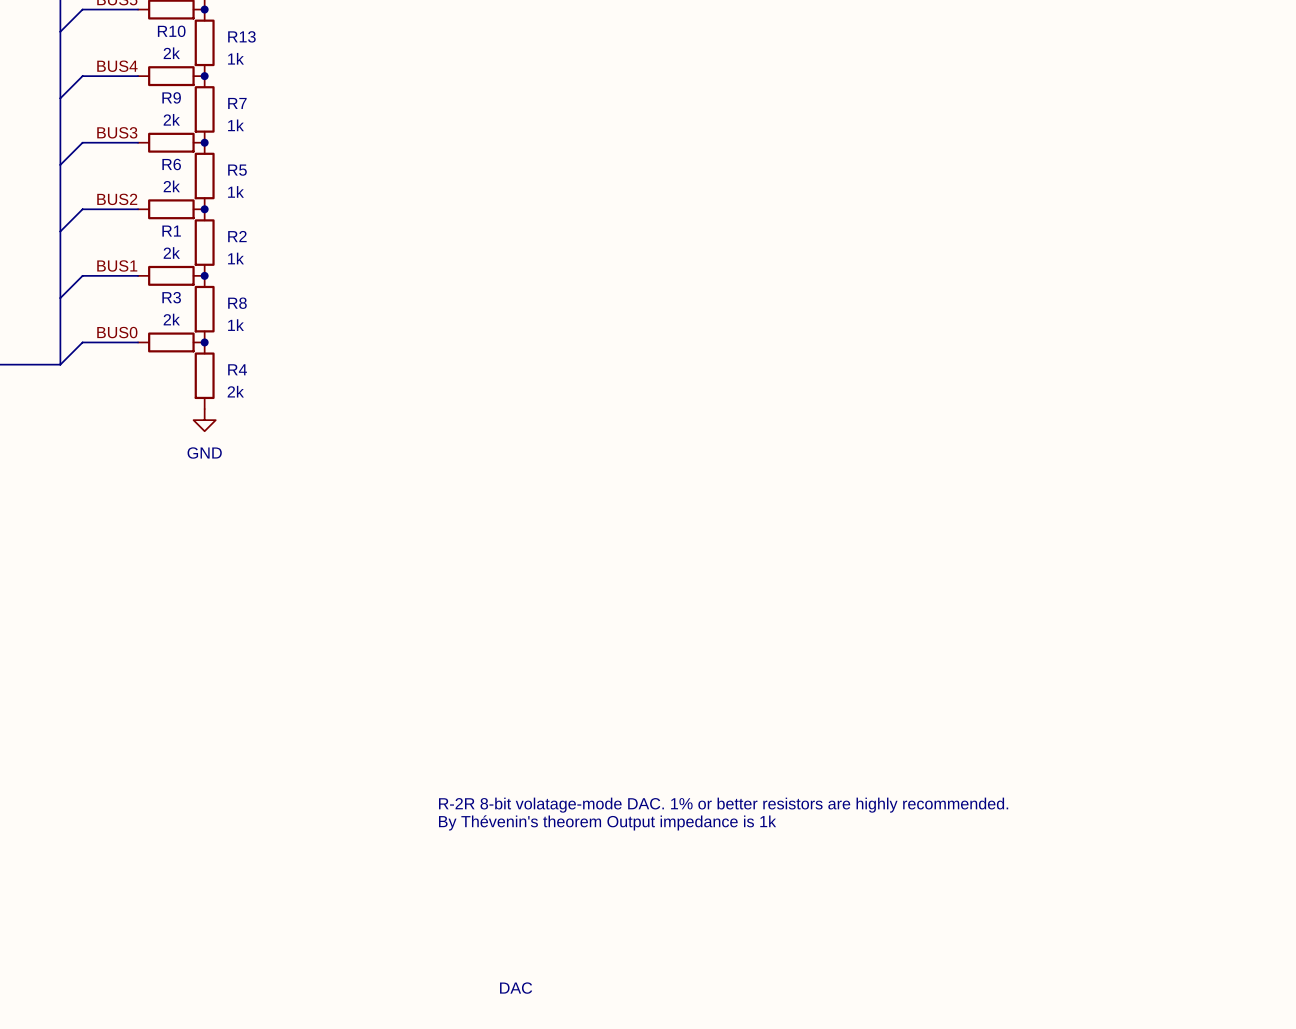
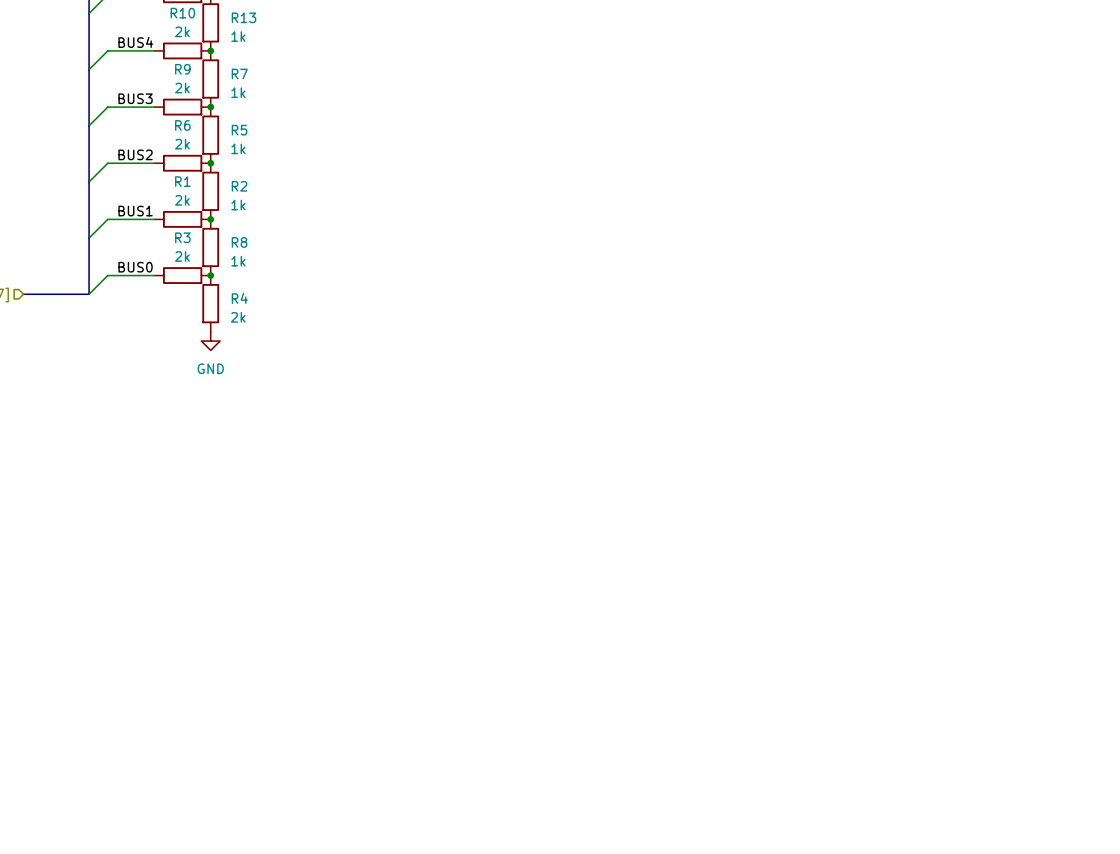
text: R-2R 8-bit volatage-mode DAC. 1% or better resistors are highly recommended. (723, 805) -> none
text: By Thévenin's theorem Output impedance is 1k (607, 822) -> none
text: DAC (516, 988) -> none

